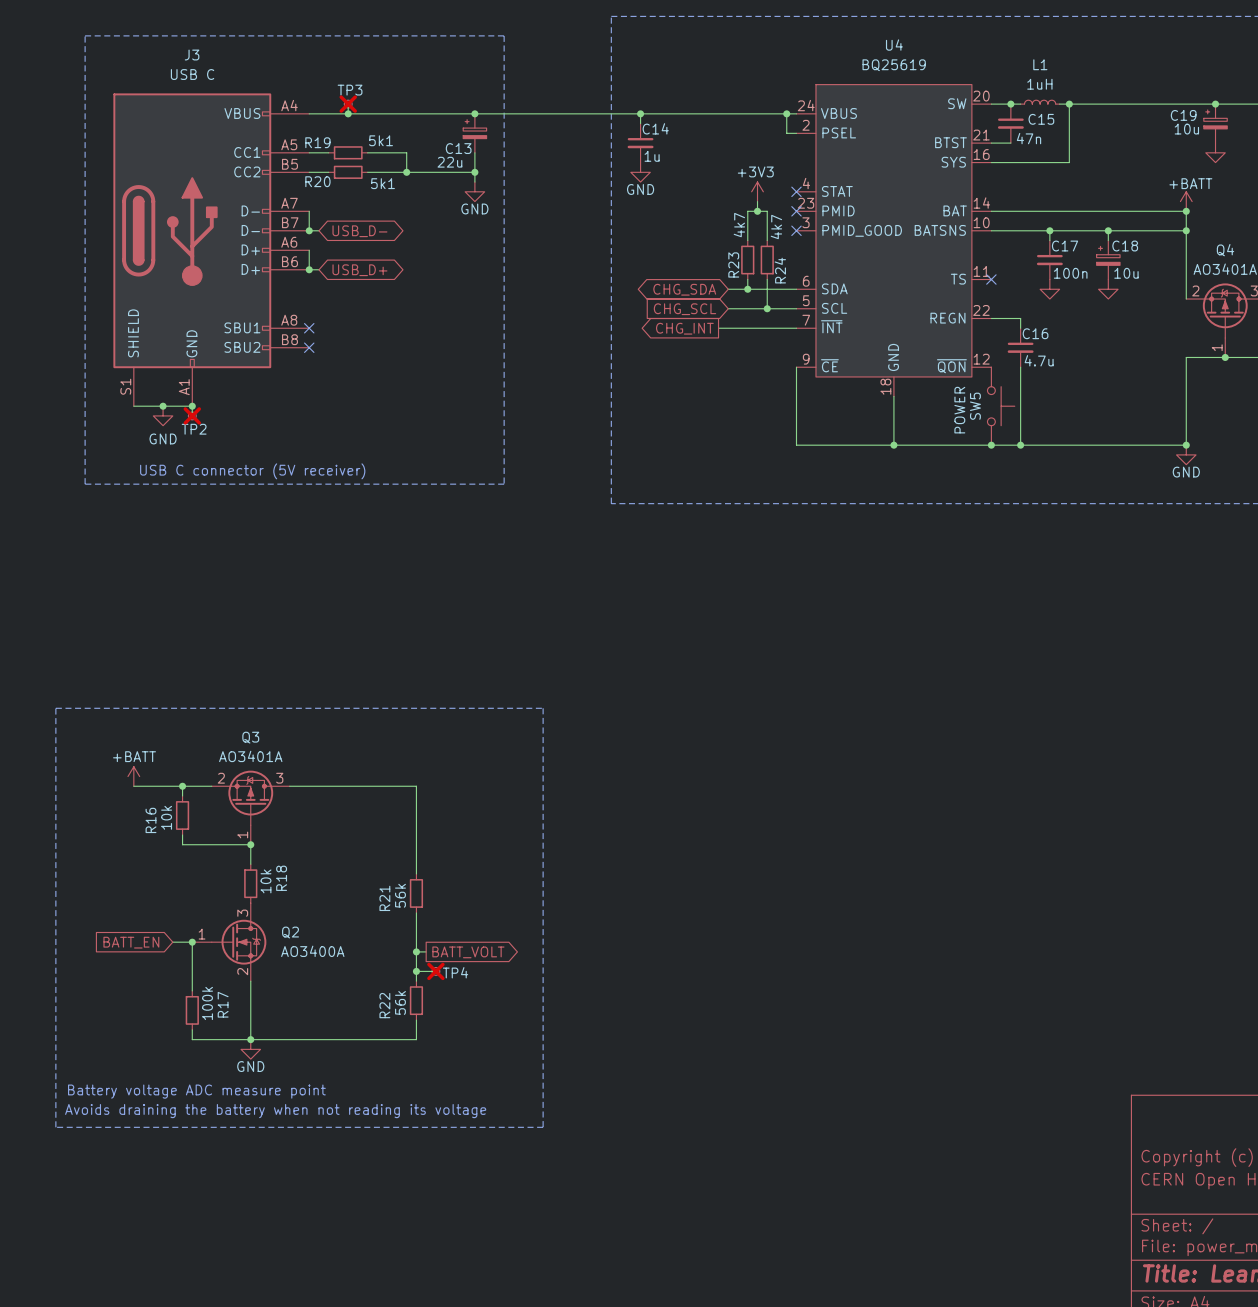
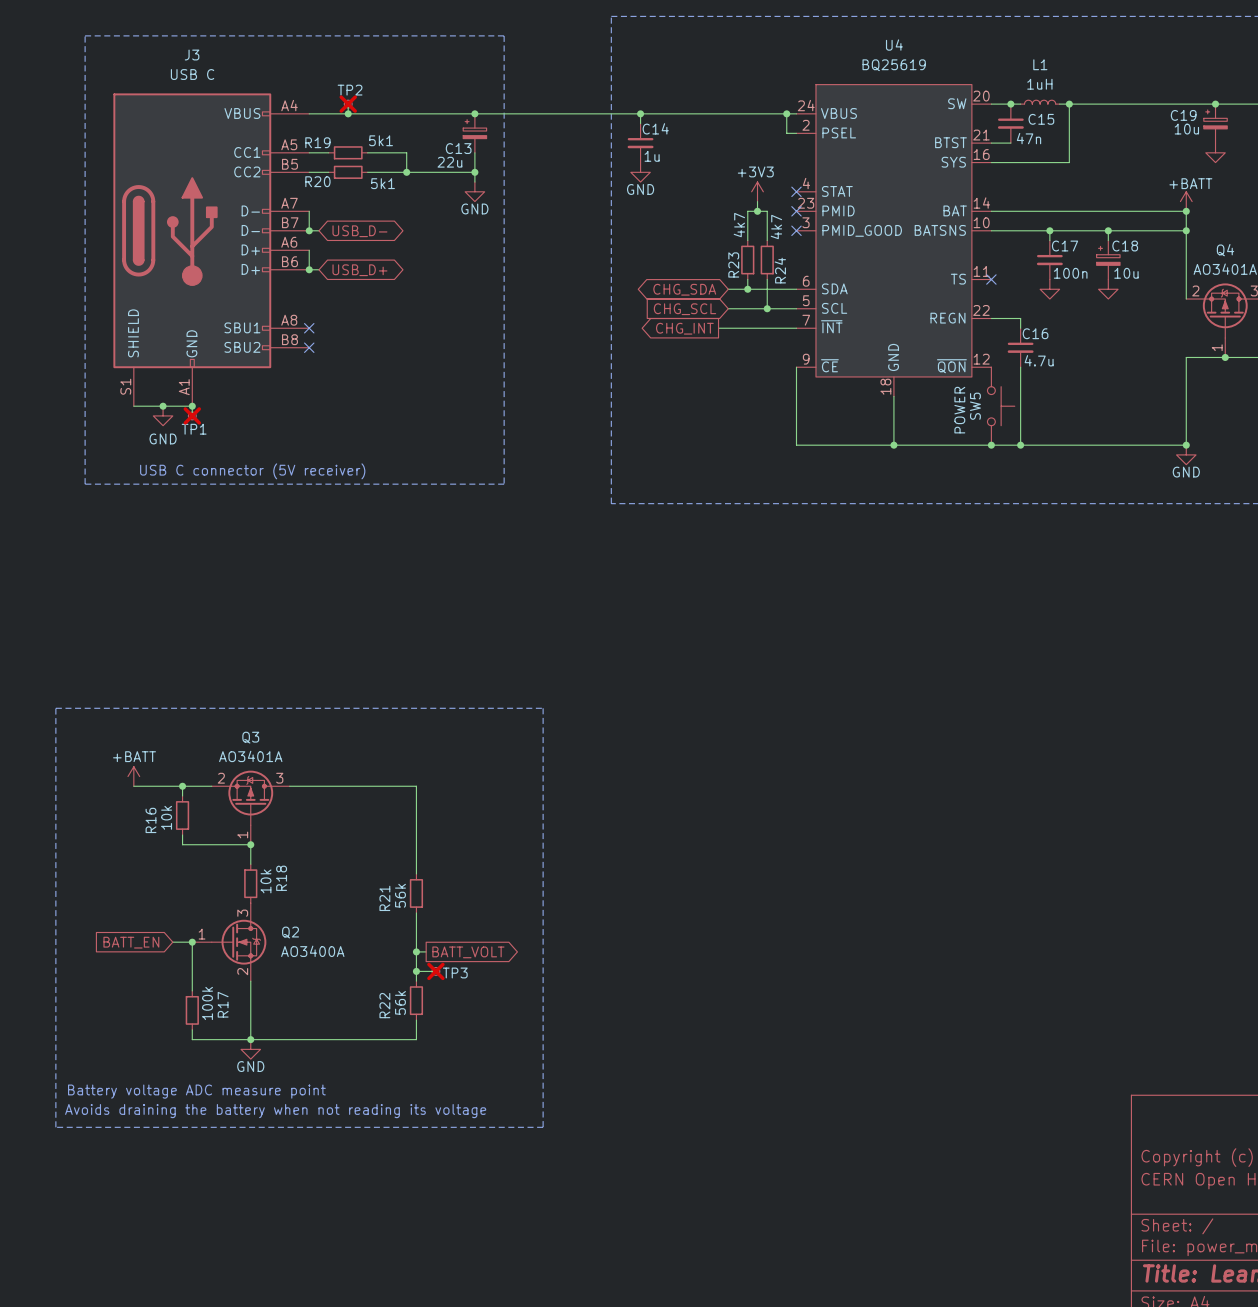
TP3 name: TP3 (350, 90) -> TP2 (350, 90)
TP2 name: TP2 (194, 429) -> TP1 (194, 429)
TP4 name: TP4 (455, 972) -> TP3 (455, 972)

